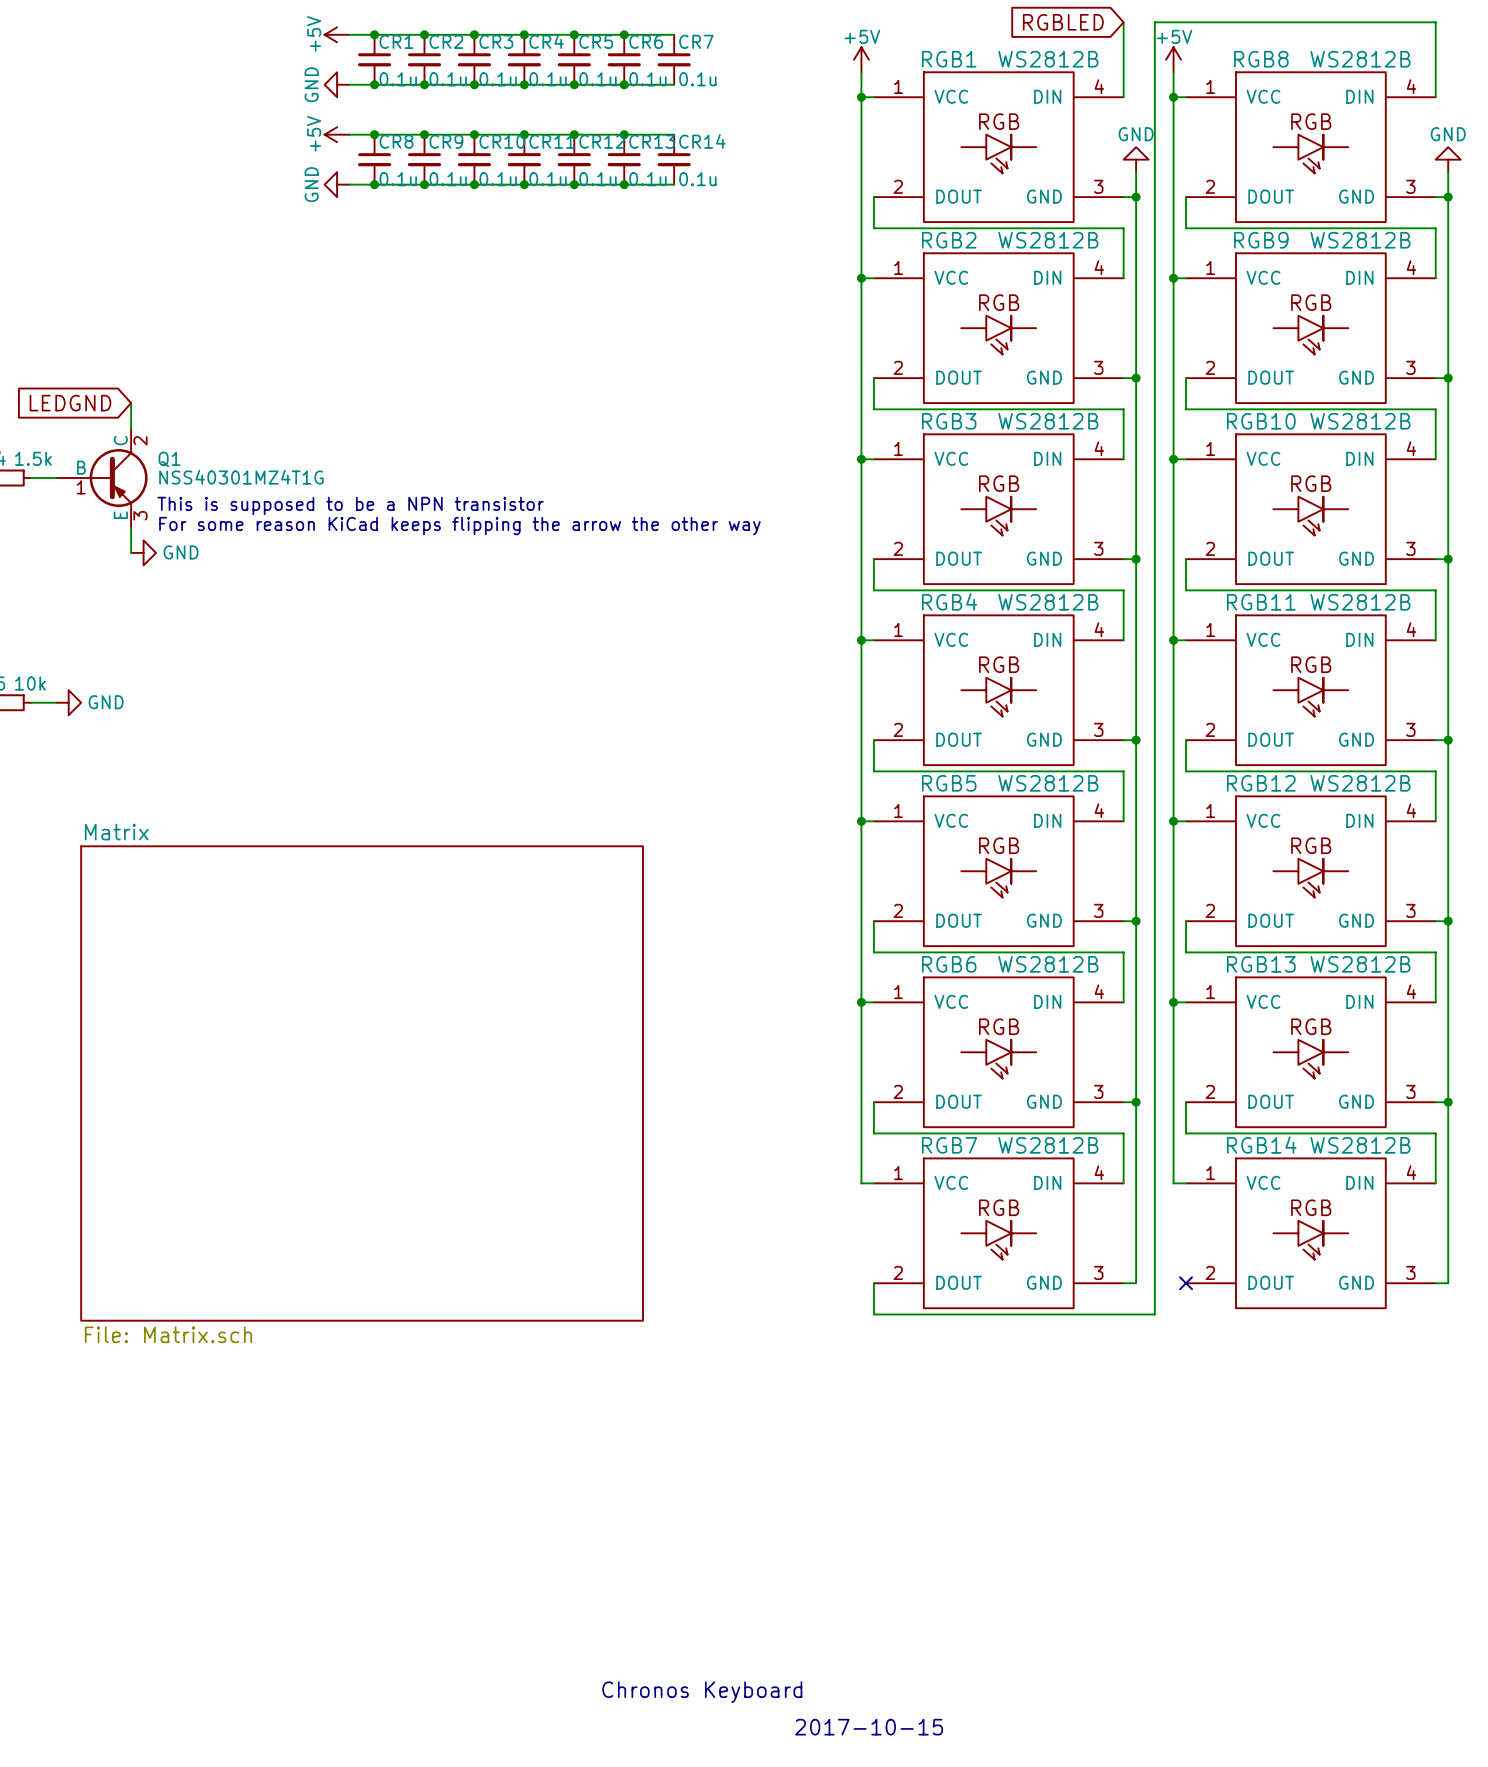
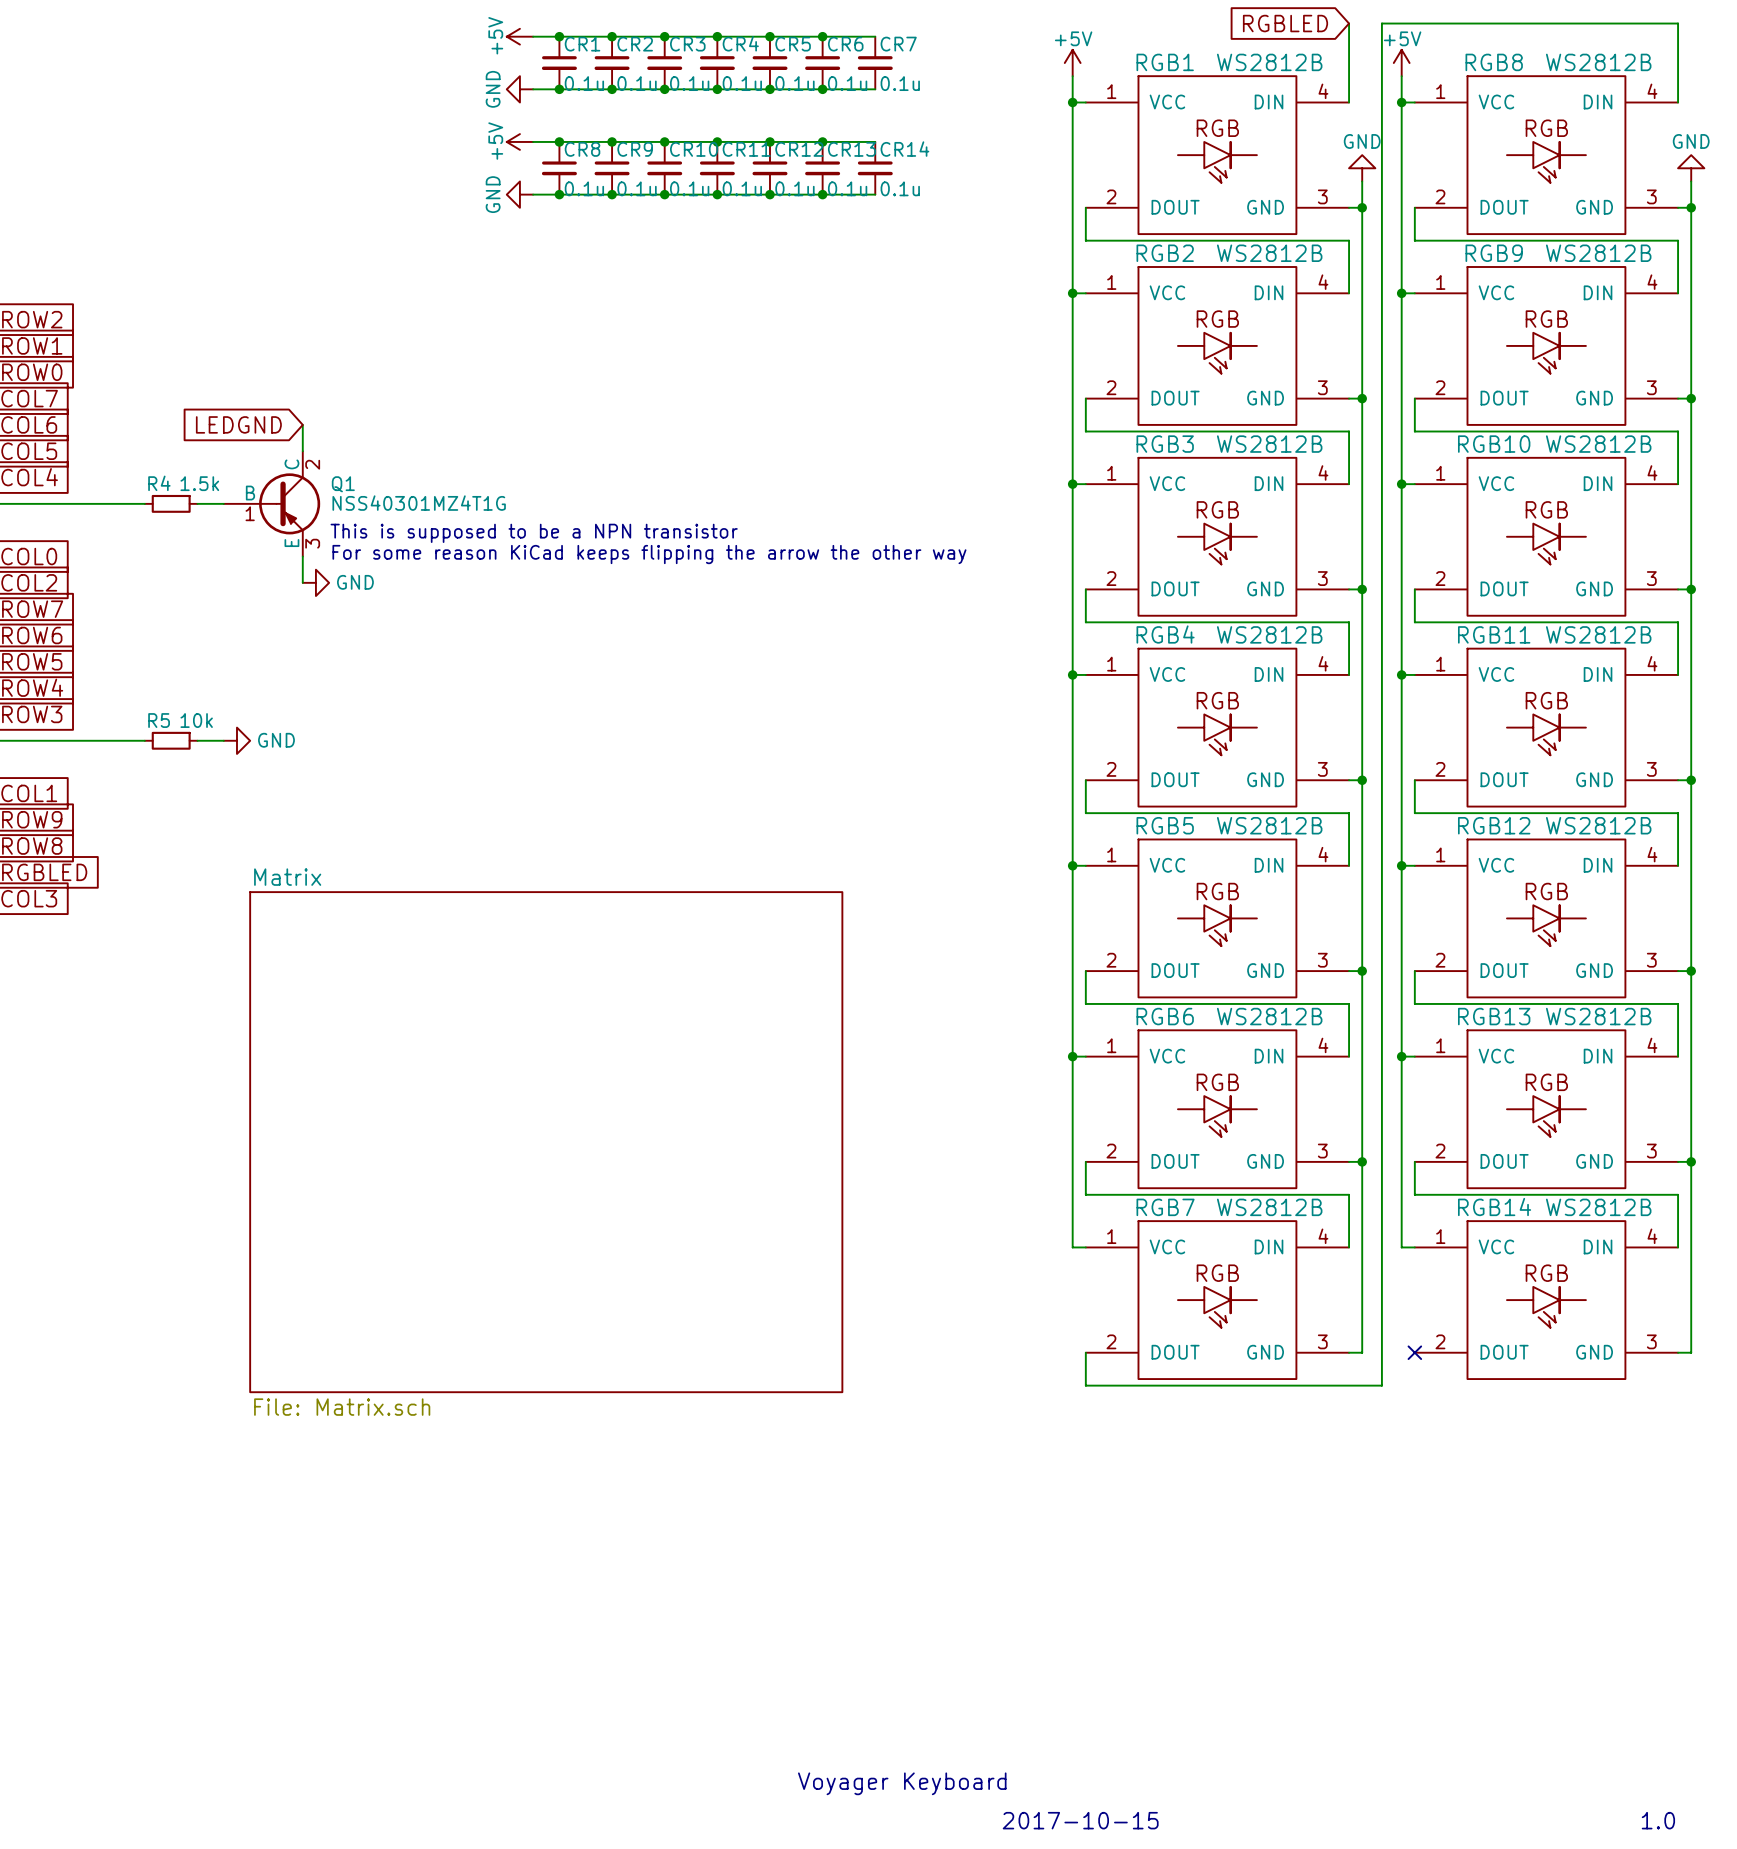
text: Chronos Keyboard (702, 1692) -> Voyager Keyboard (902, 1783)
text: none -> 1.0 (1658, 1820)

